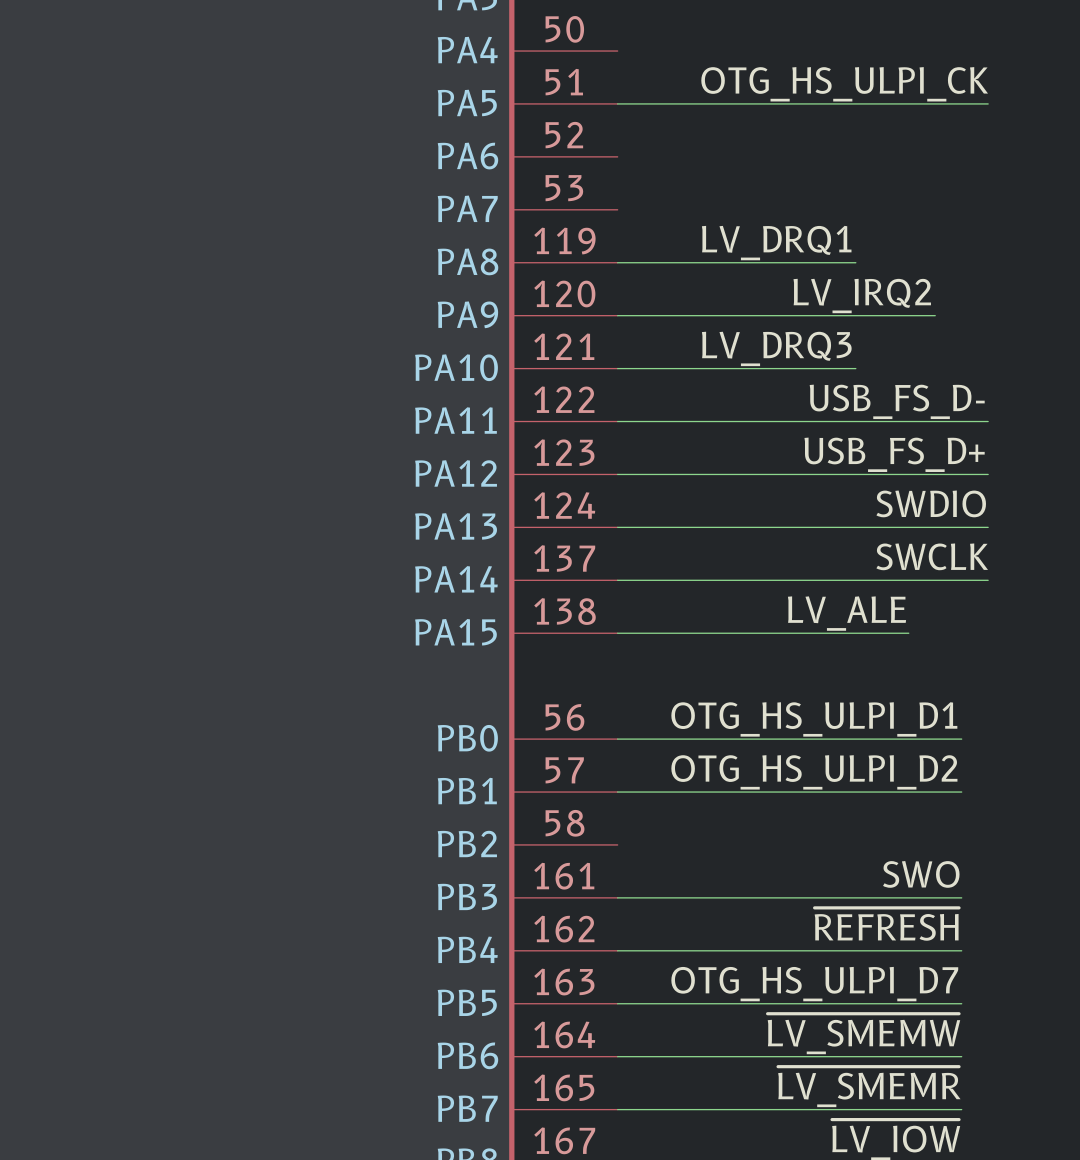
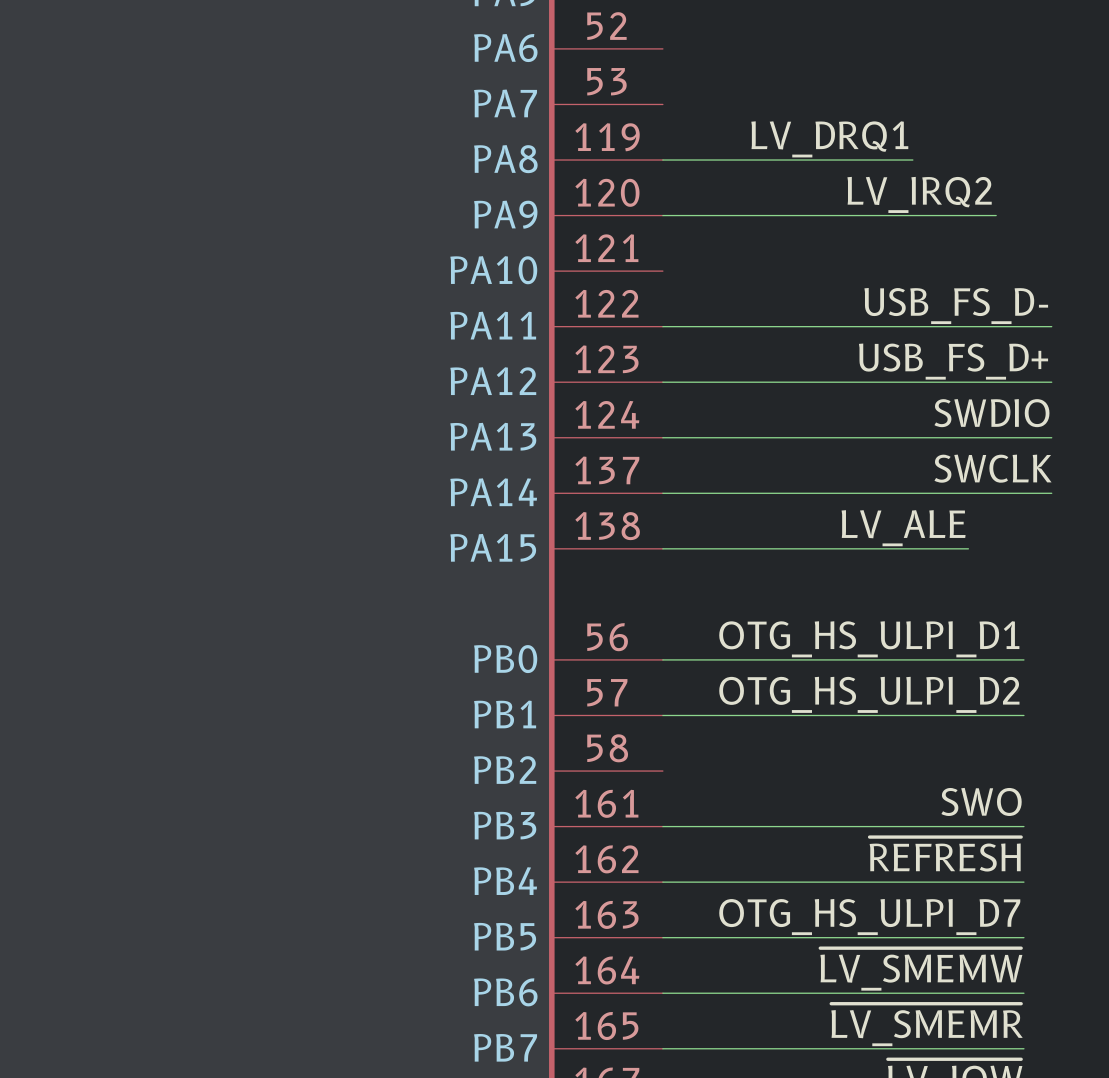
label: LV_DRQ3 (776, 348) -> none
wire: (617, 368) (855, 368) -> none

